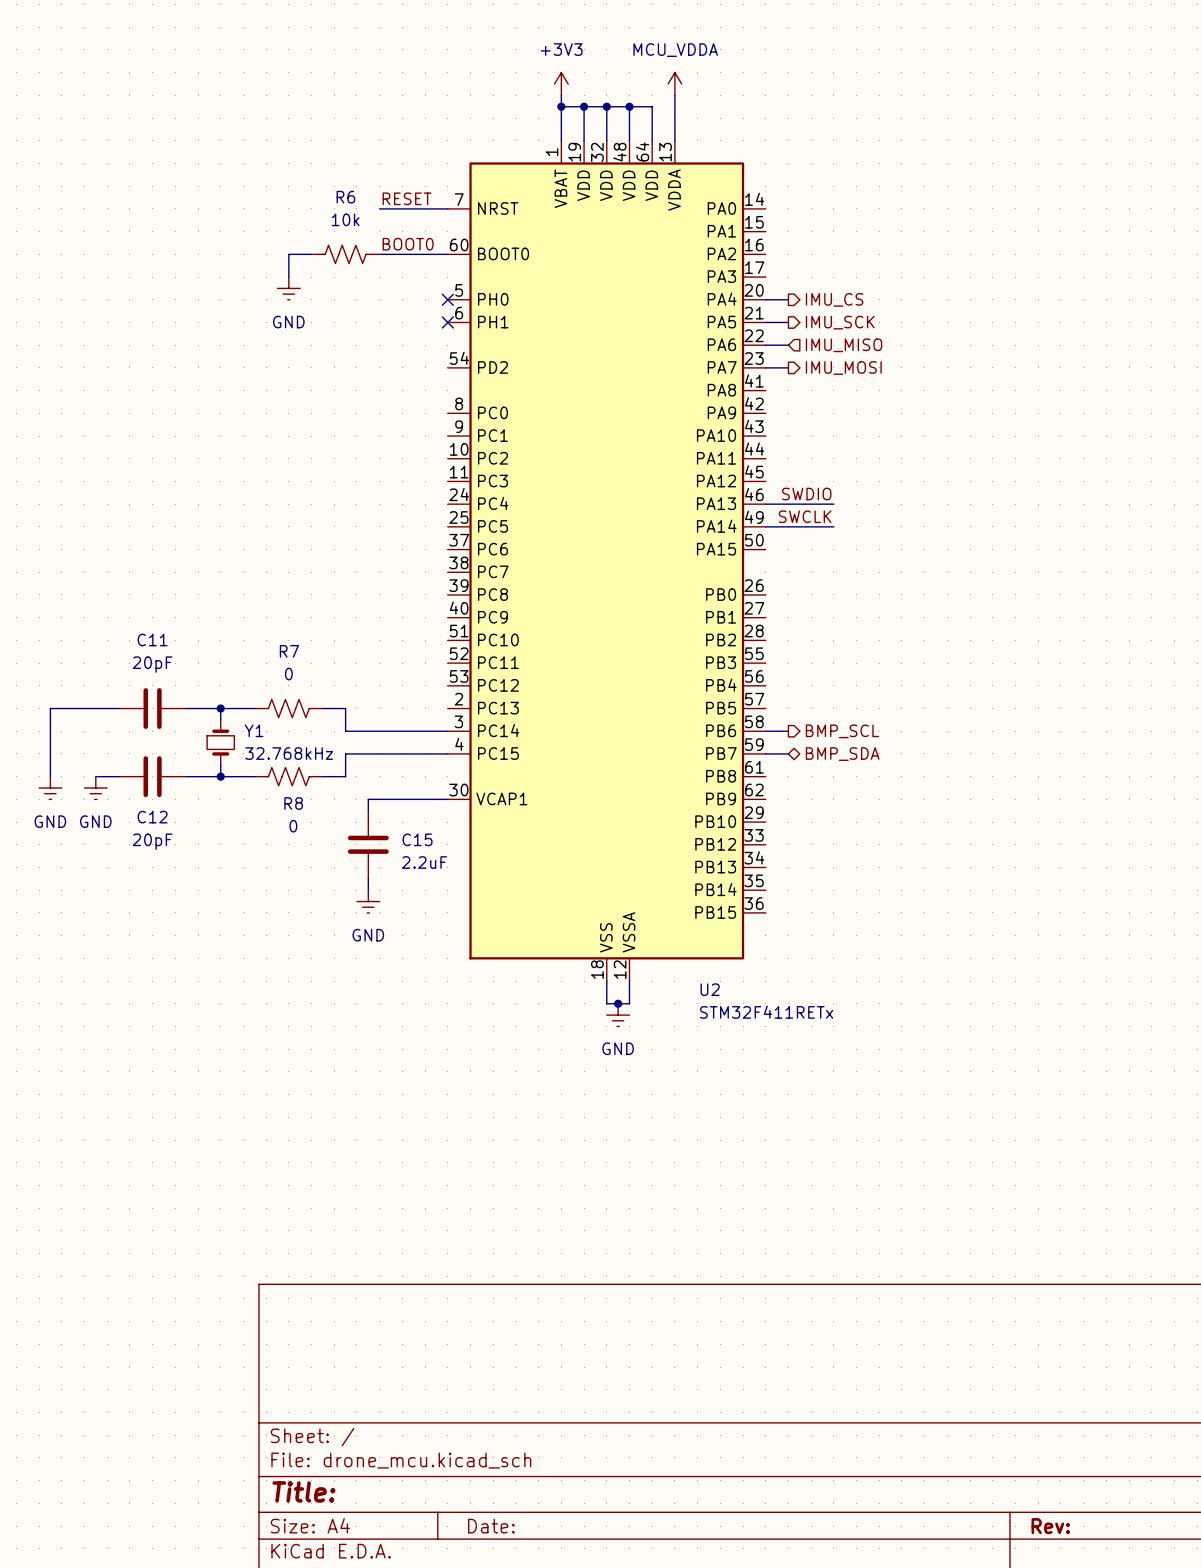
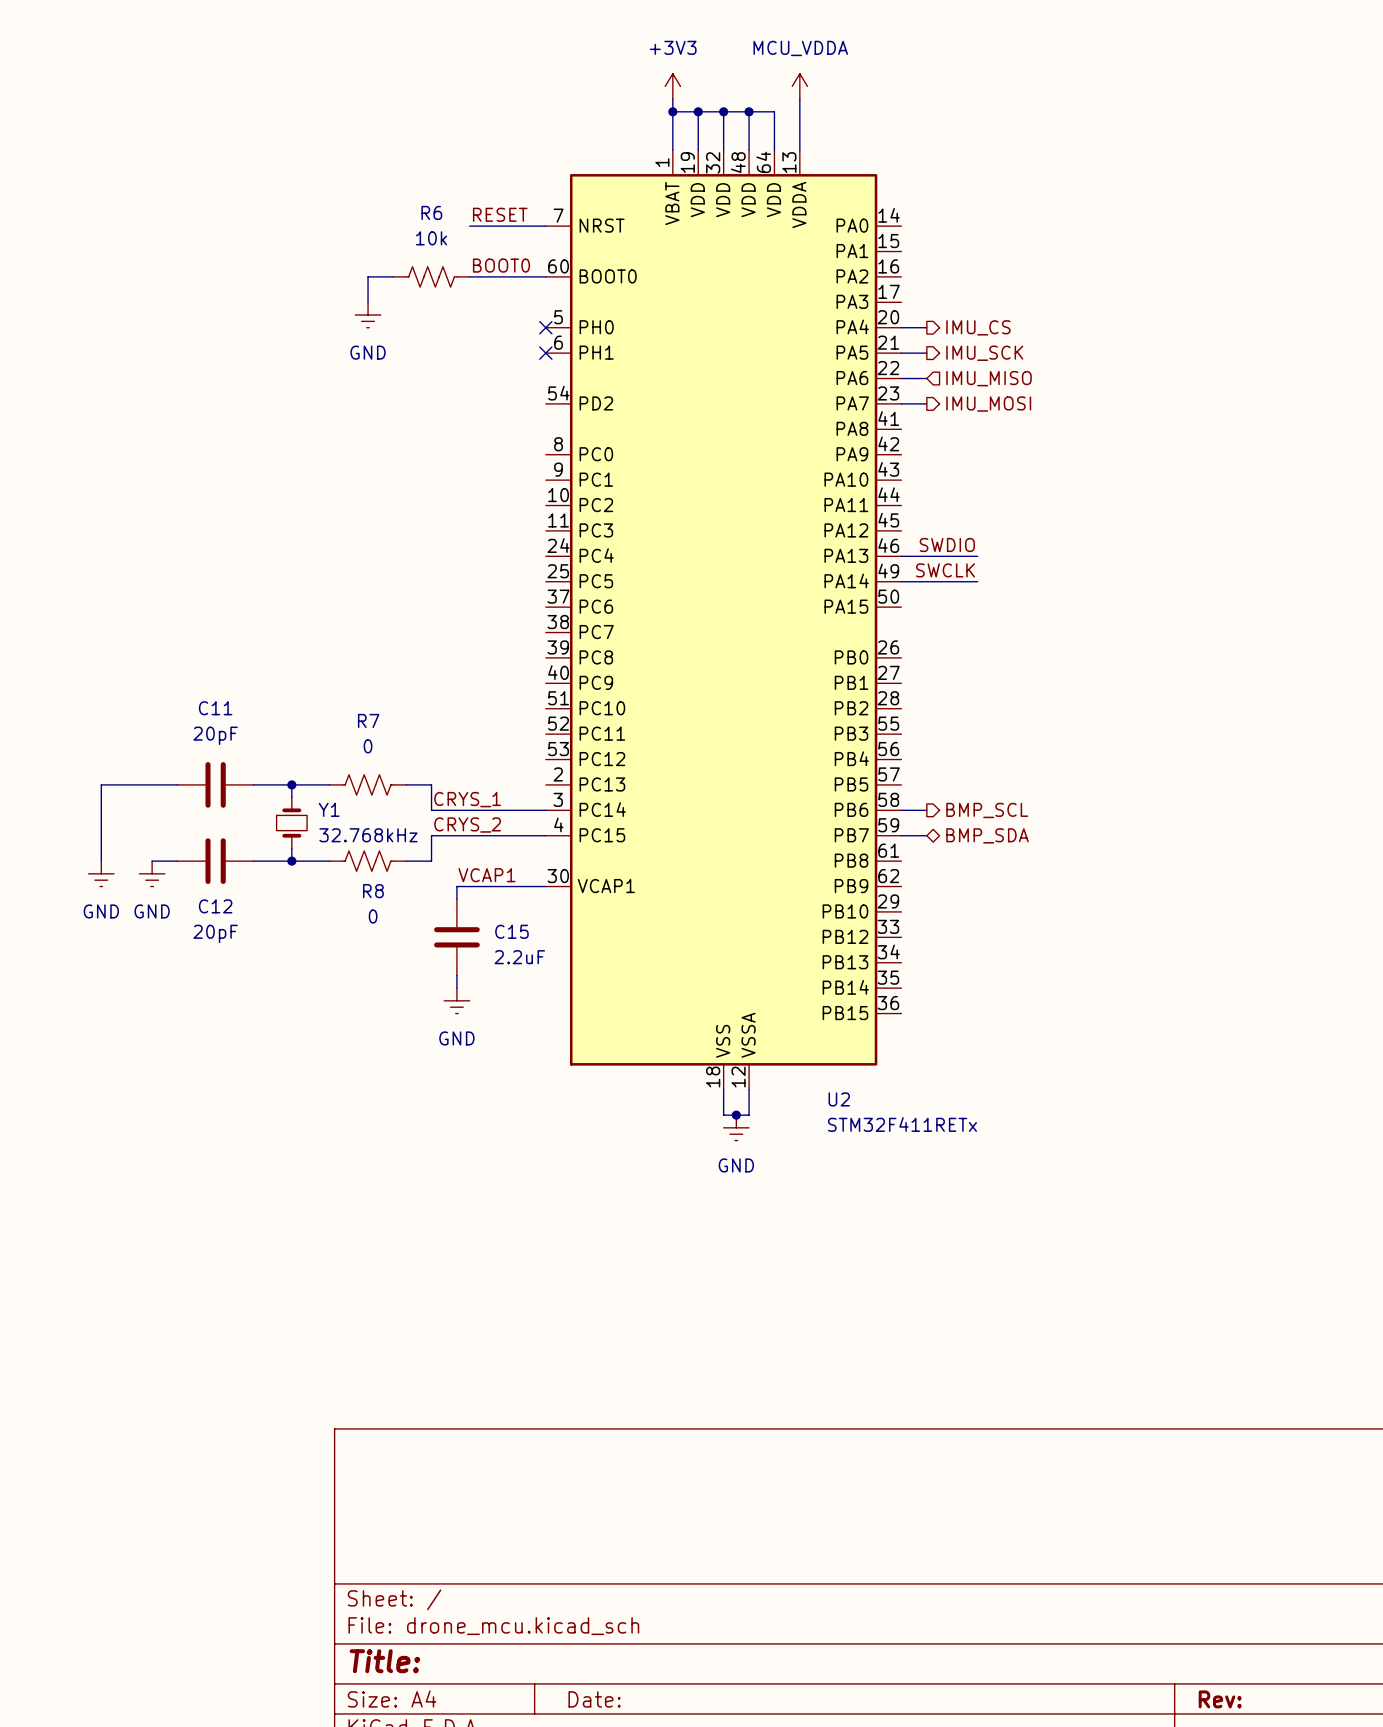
label: none -> CRYS_1 (467, 799)
label: none -> CRYS_2 (467, 825)
label: none -> VCAP1 (486, 875)

